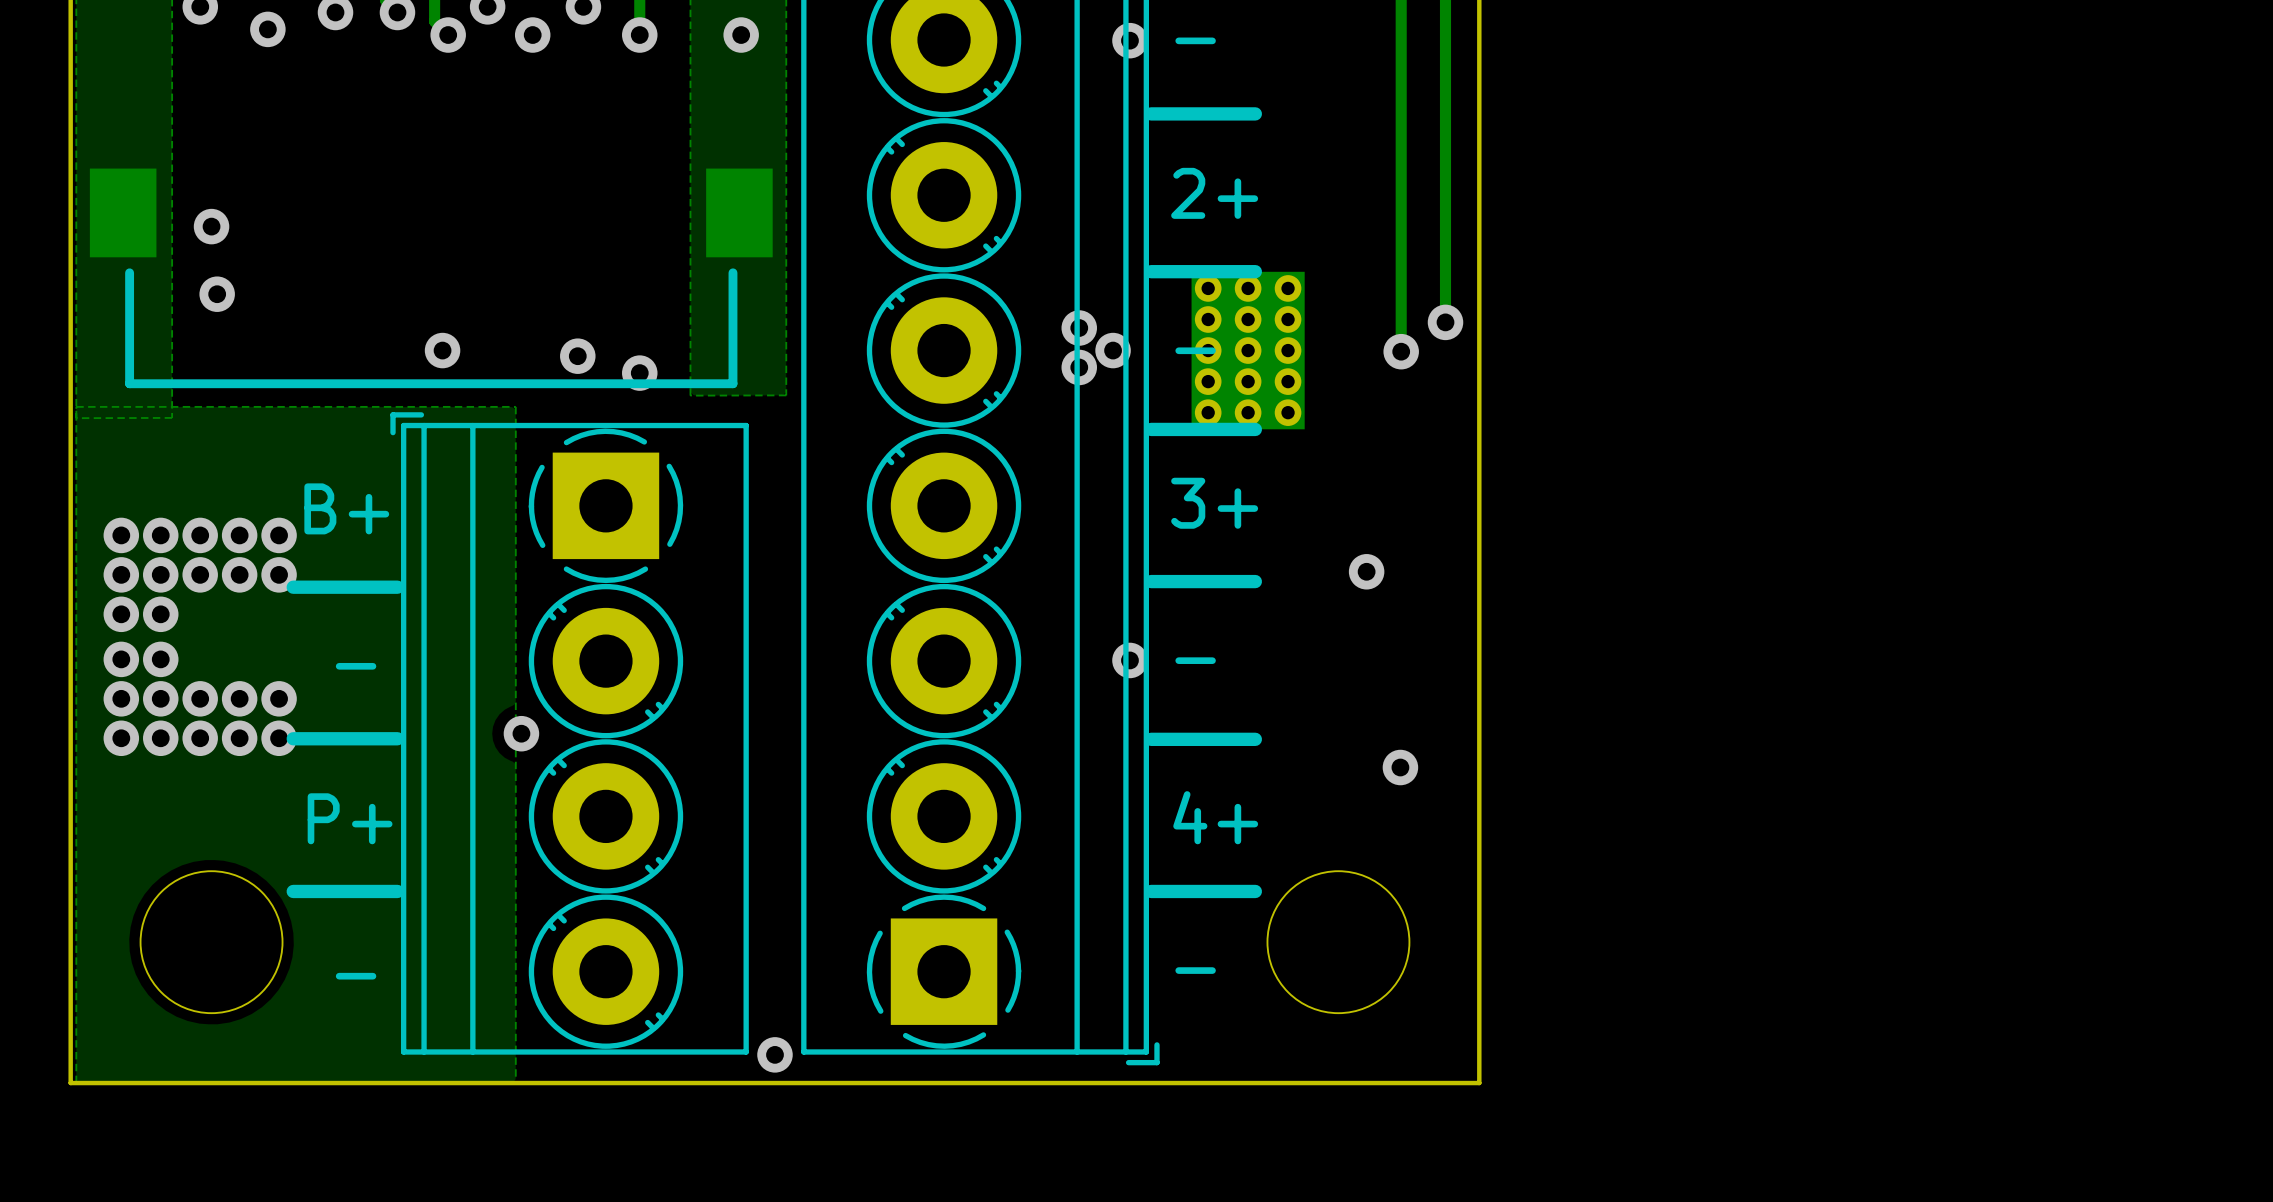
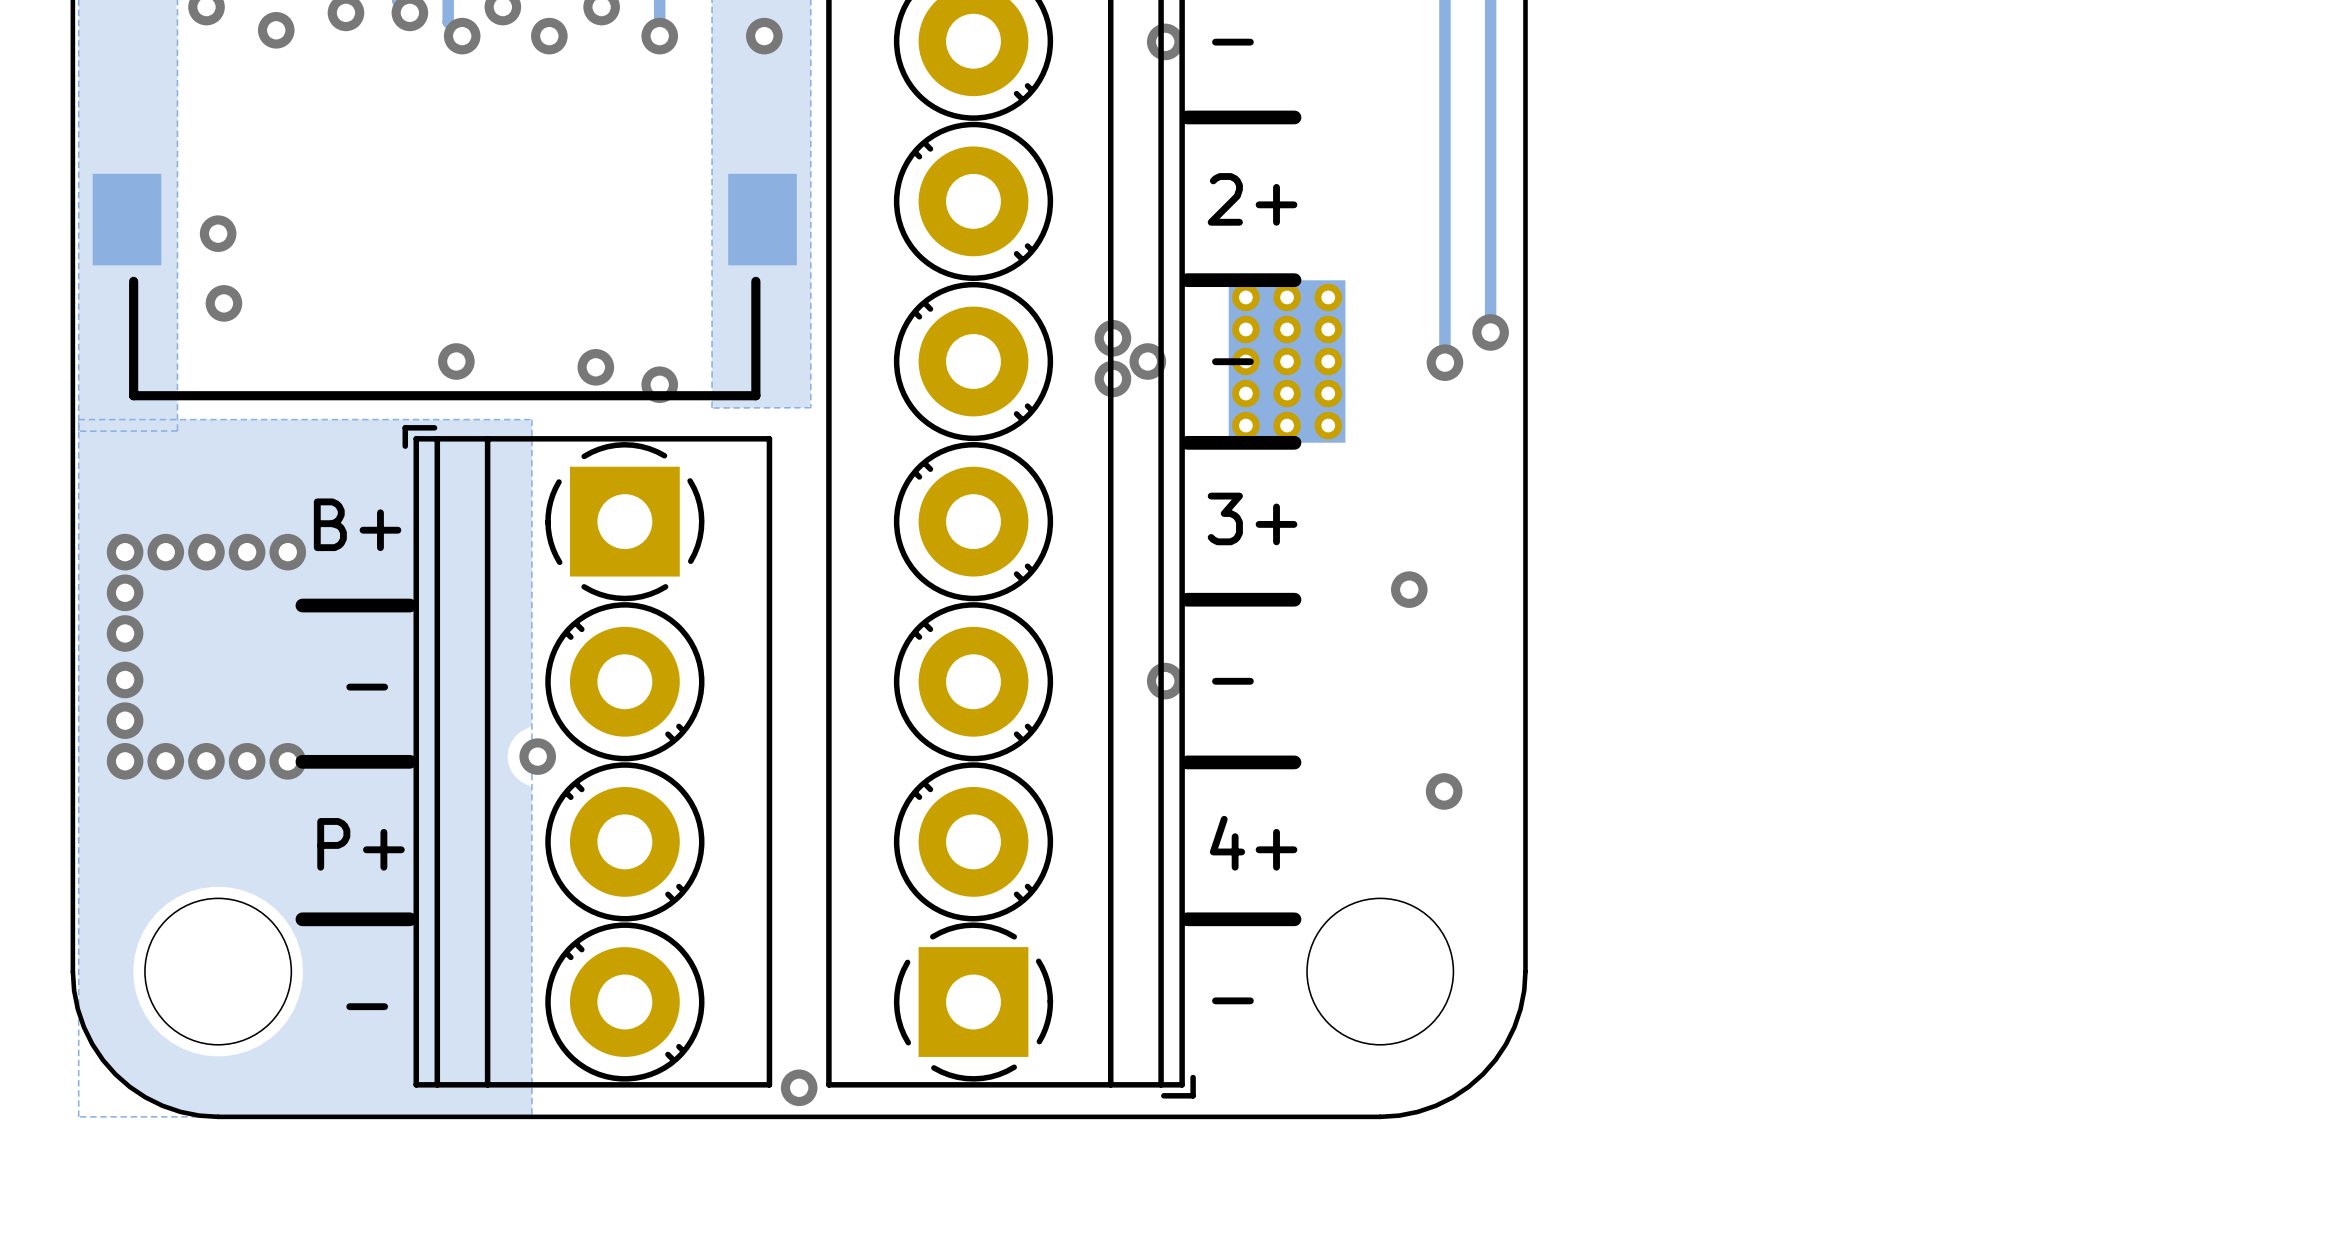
via: (160, 574) -> none
via: (200, 574) -> none
via: (239, 574) -> none
via: (279, 574) -> none
via: (160, 614) -> none
via: (160, 659) -> none
via: (160, 698) -> none
via: (200, 698) -> none
via: (239, 698) -> none
via: (279, 698) -> none
board edge: (70, 942) (70, 1083) (211, 1083) -> (72, 971) (74, 990) (83, 1027) (102, 1060) (115, 1074) (145, 1097) (162, 1105) (180, 1111) (218, 1116)
board edge: (1479, 942) (1479, 1083) (1338, 1083) -> (1525, 971) (1520, 1009) (1514, 1027) (1495, 1060) (1482, 1074) (1452, 1097) (1435, 1105) (1417, 1111) (1380, 1116)

